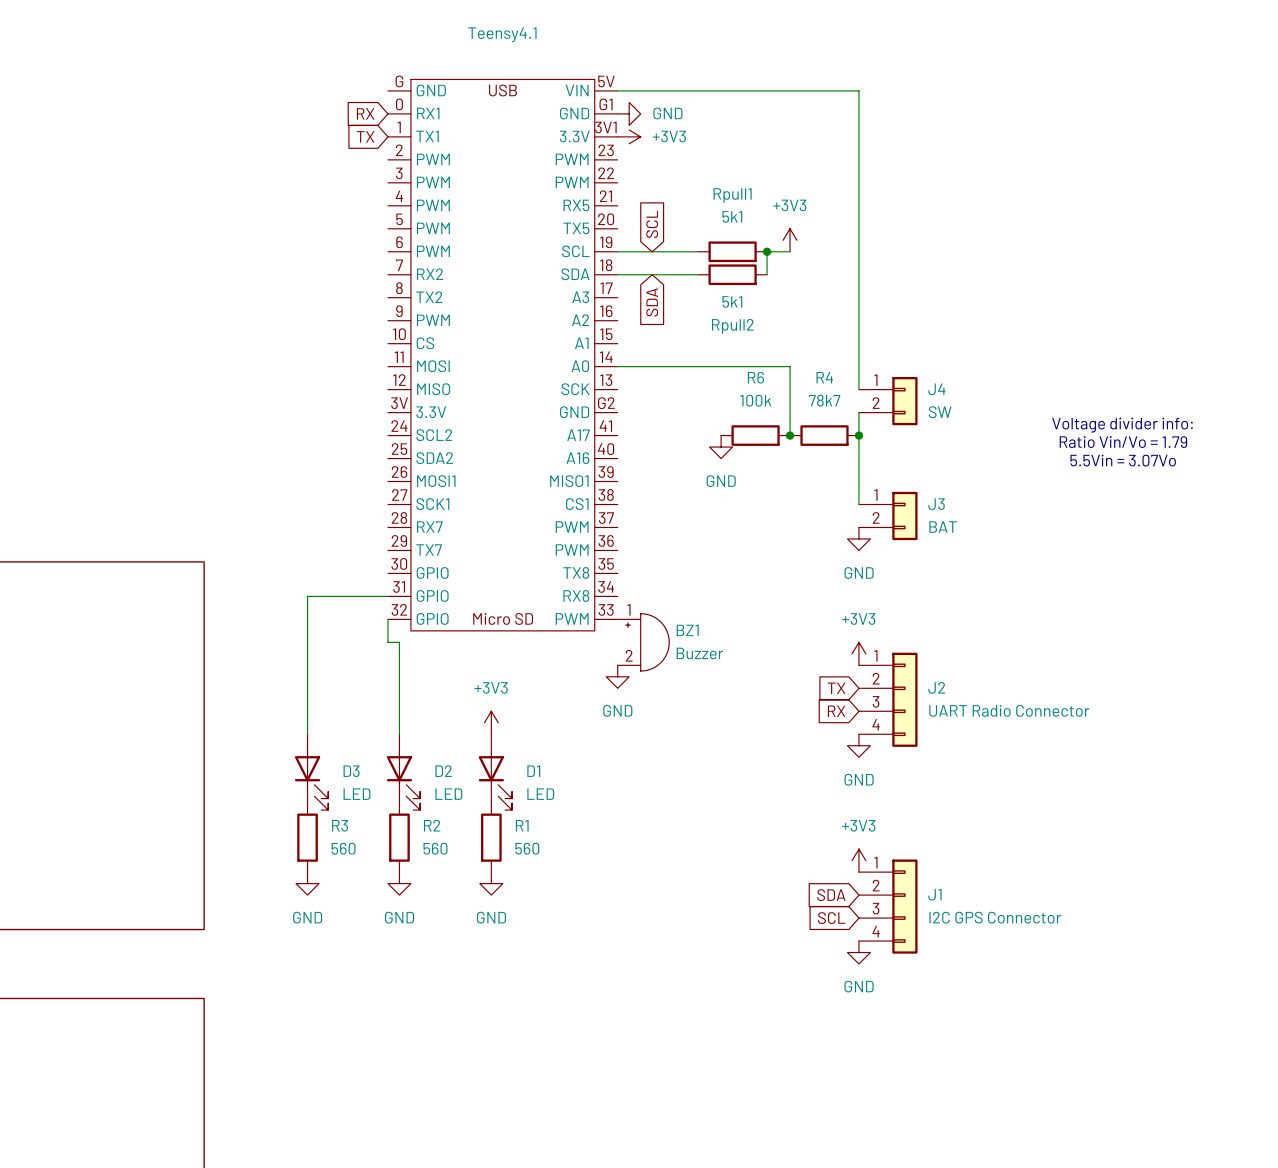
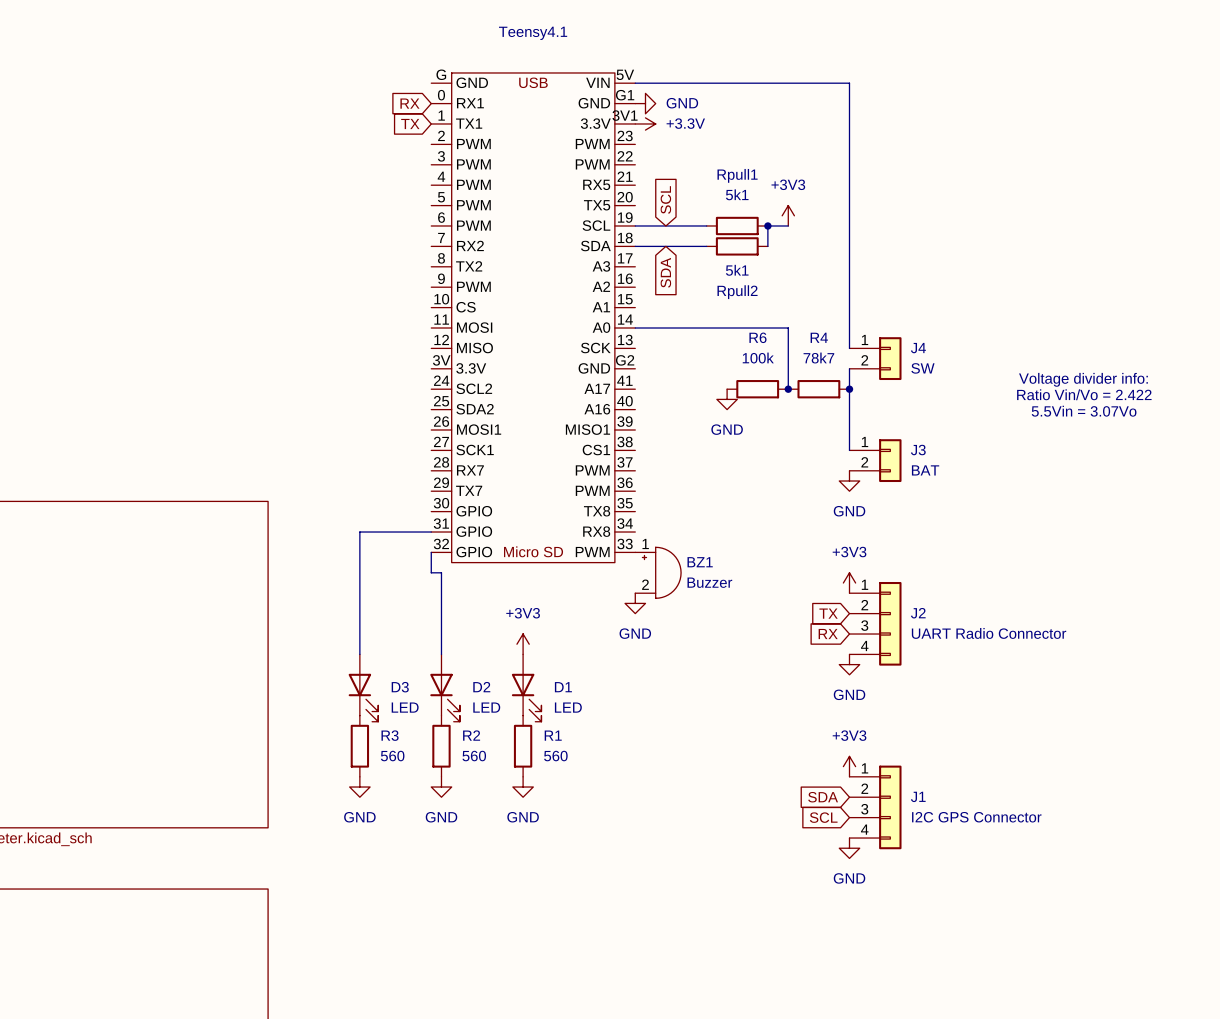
power symbol: +3V3 (629, 136) -> +3.3V (645, 123)
text: Ratio Vin/Vo = 1.79 (1123, 442) -> Ratio Vin/Vo = 2.422 (1084, 394)

